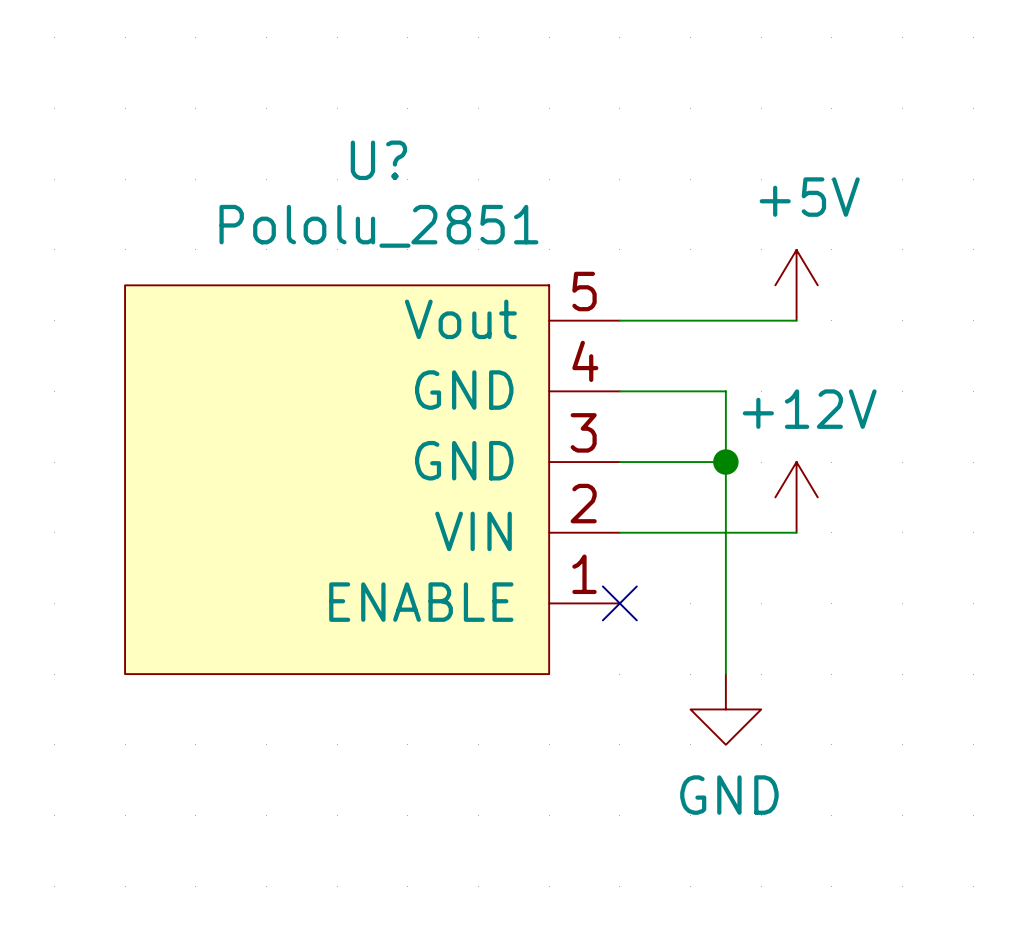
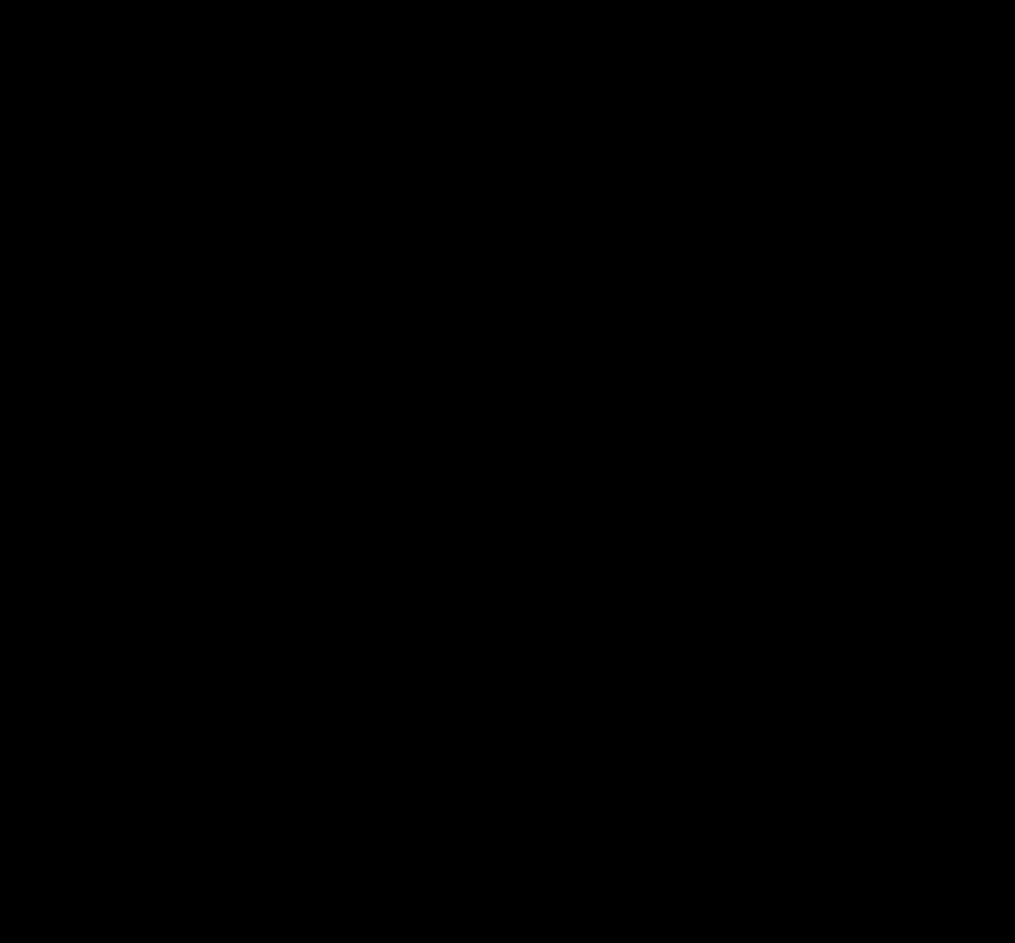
power symbol: +5V (796, 285) -> none
wire: (619, 320) (796, 320) -> none
wire: (619, 391) (725, 391) (725, 674) -> none
wire: (619, 462) (725, 462) -> none
junction: (725, 462) -> none
U?: Pololu_2851 (372, 479) -> none
power symbol: +12V (796, 497) -> none
wire: (619, 532) (796, 532) -> none
no-connect mark: (619, 603) -> none
power symbol: GND (725, 709) -> none

